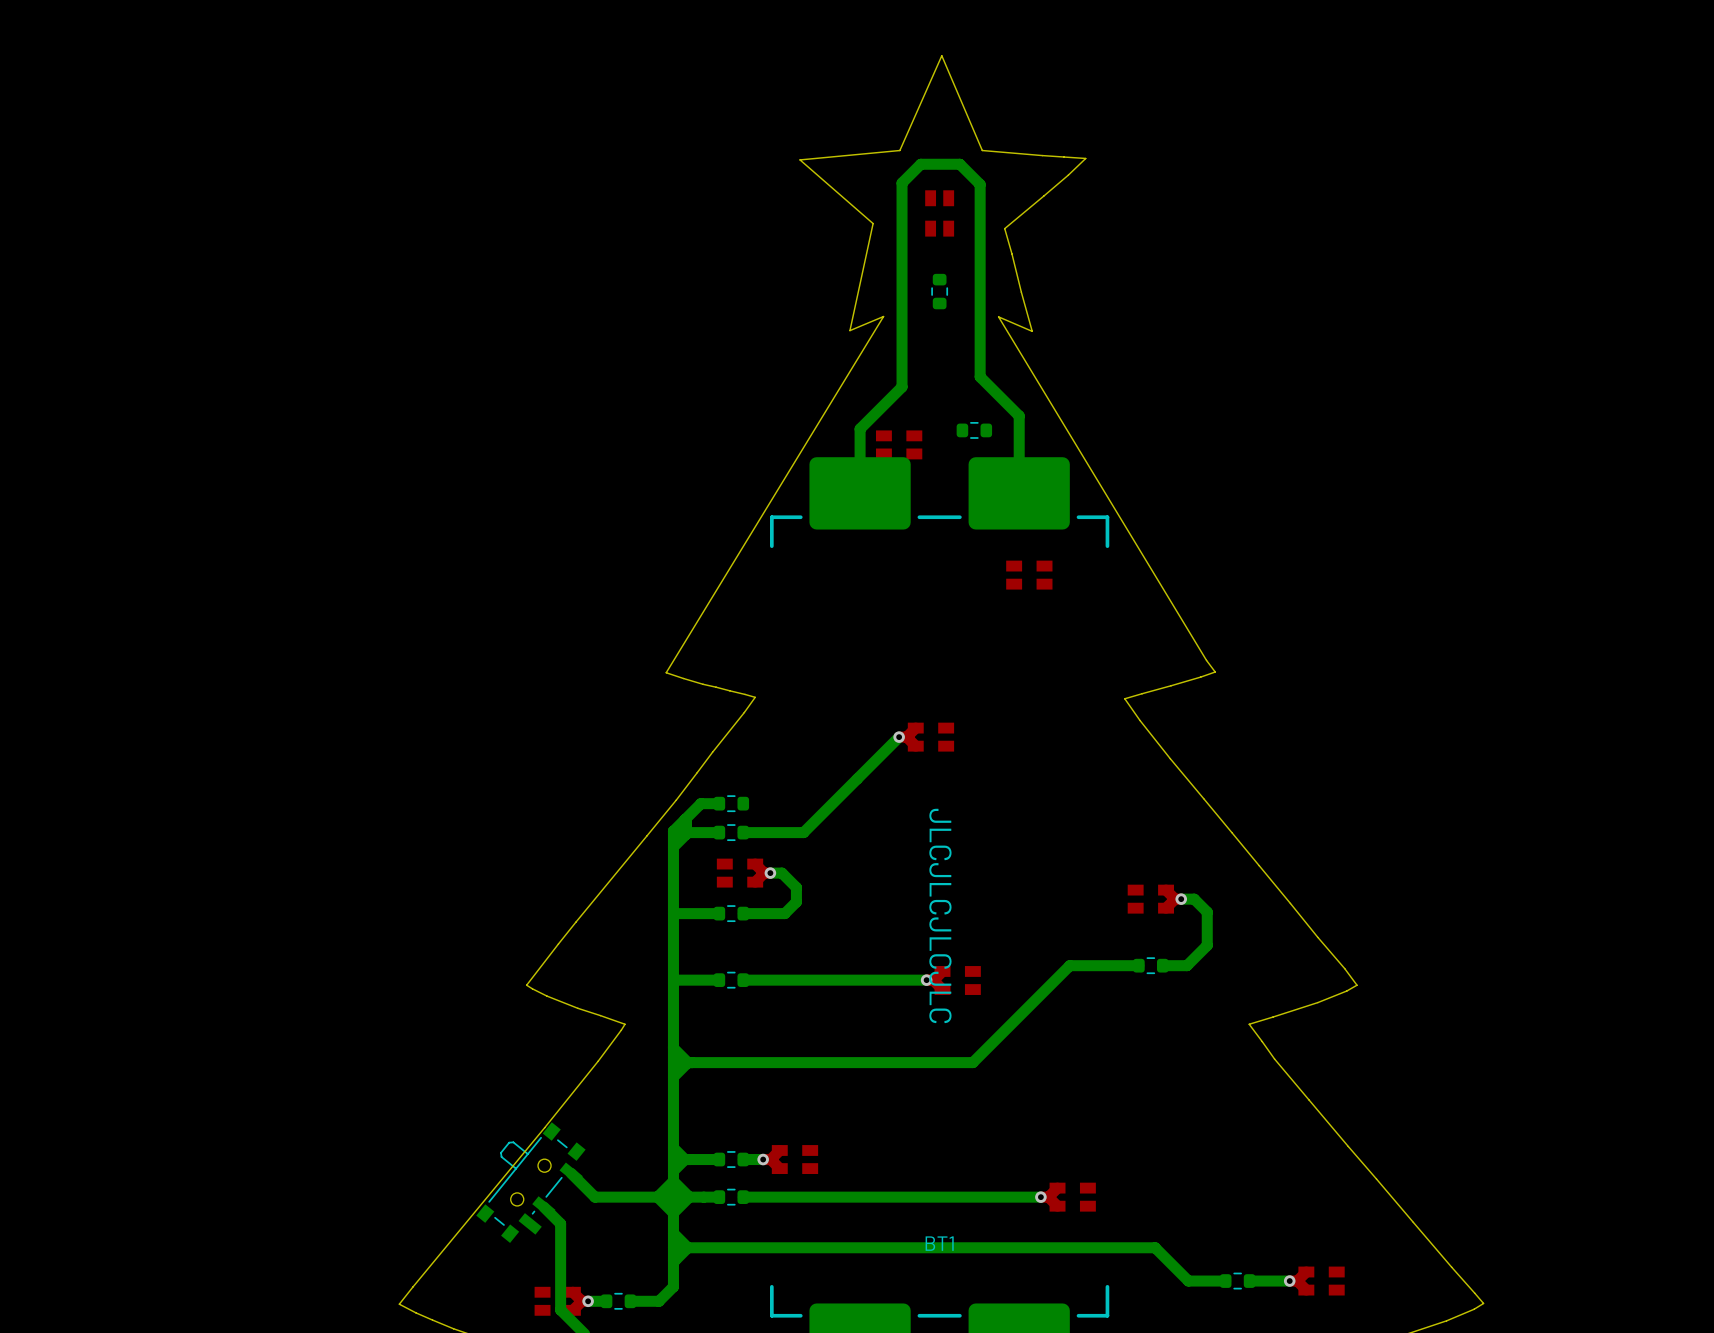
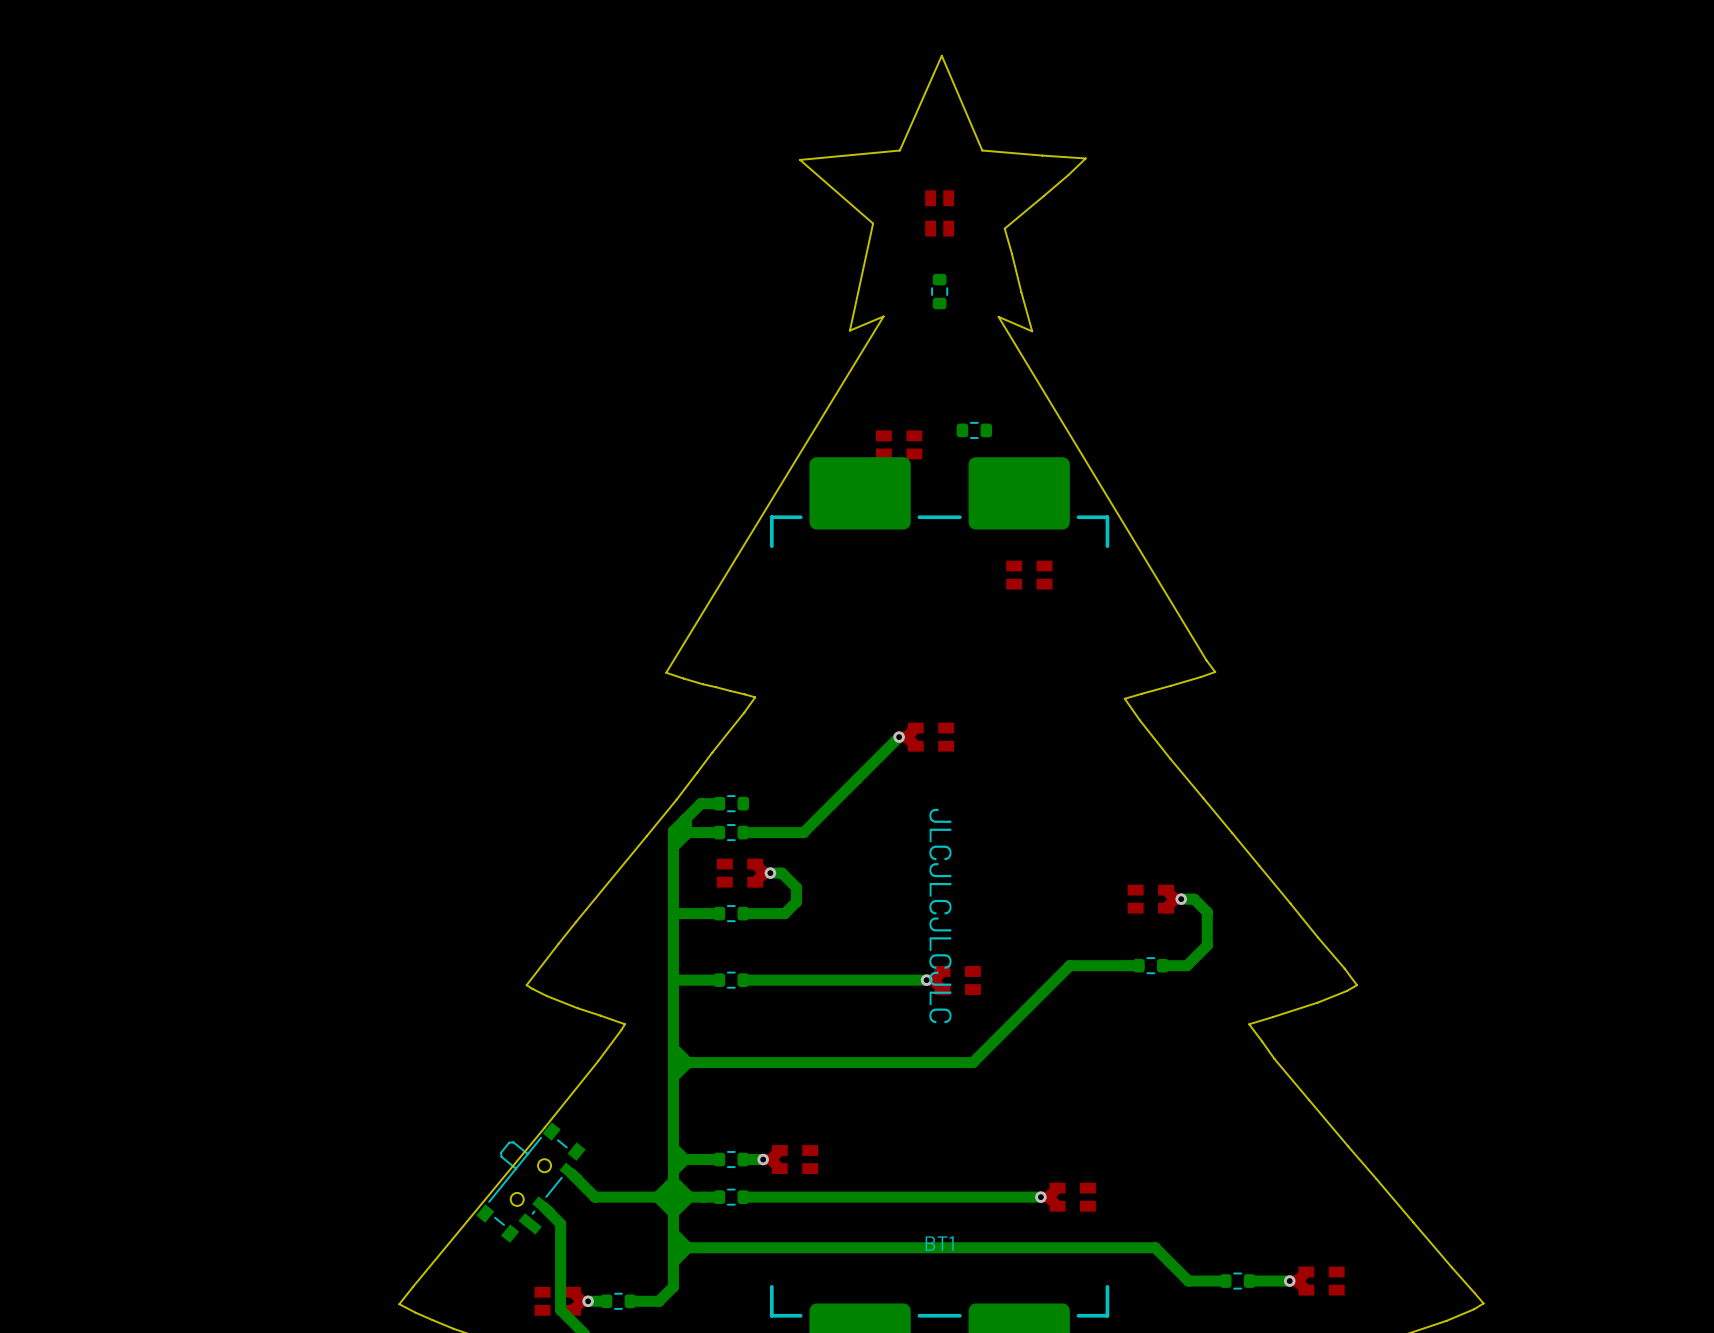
bottom track: (1019, 493) (1019, 415) (980, 376) (980, 184) (959, 164) (920, 164) (902, 183) (902, 387) (860, 428) (860, 493) -> none

